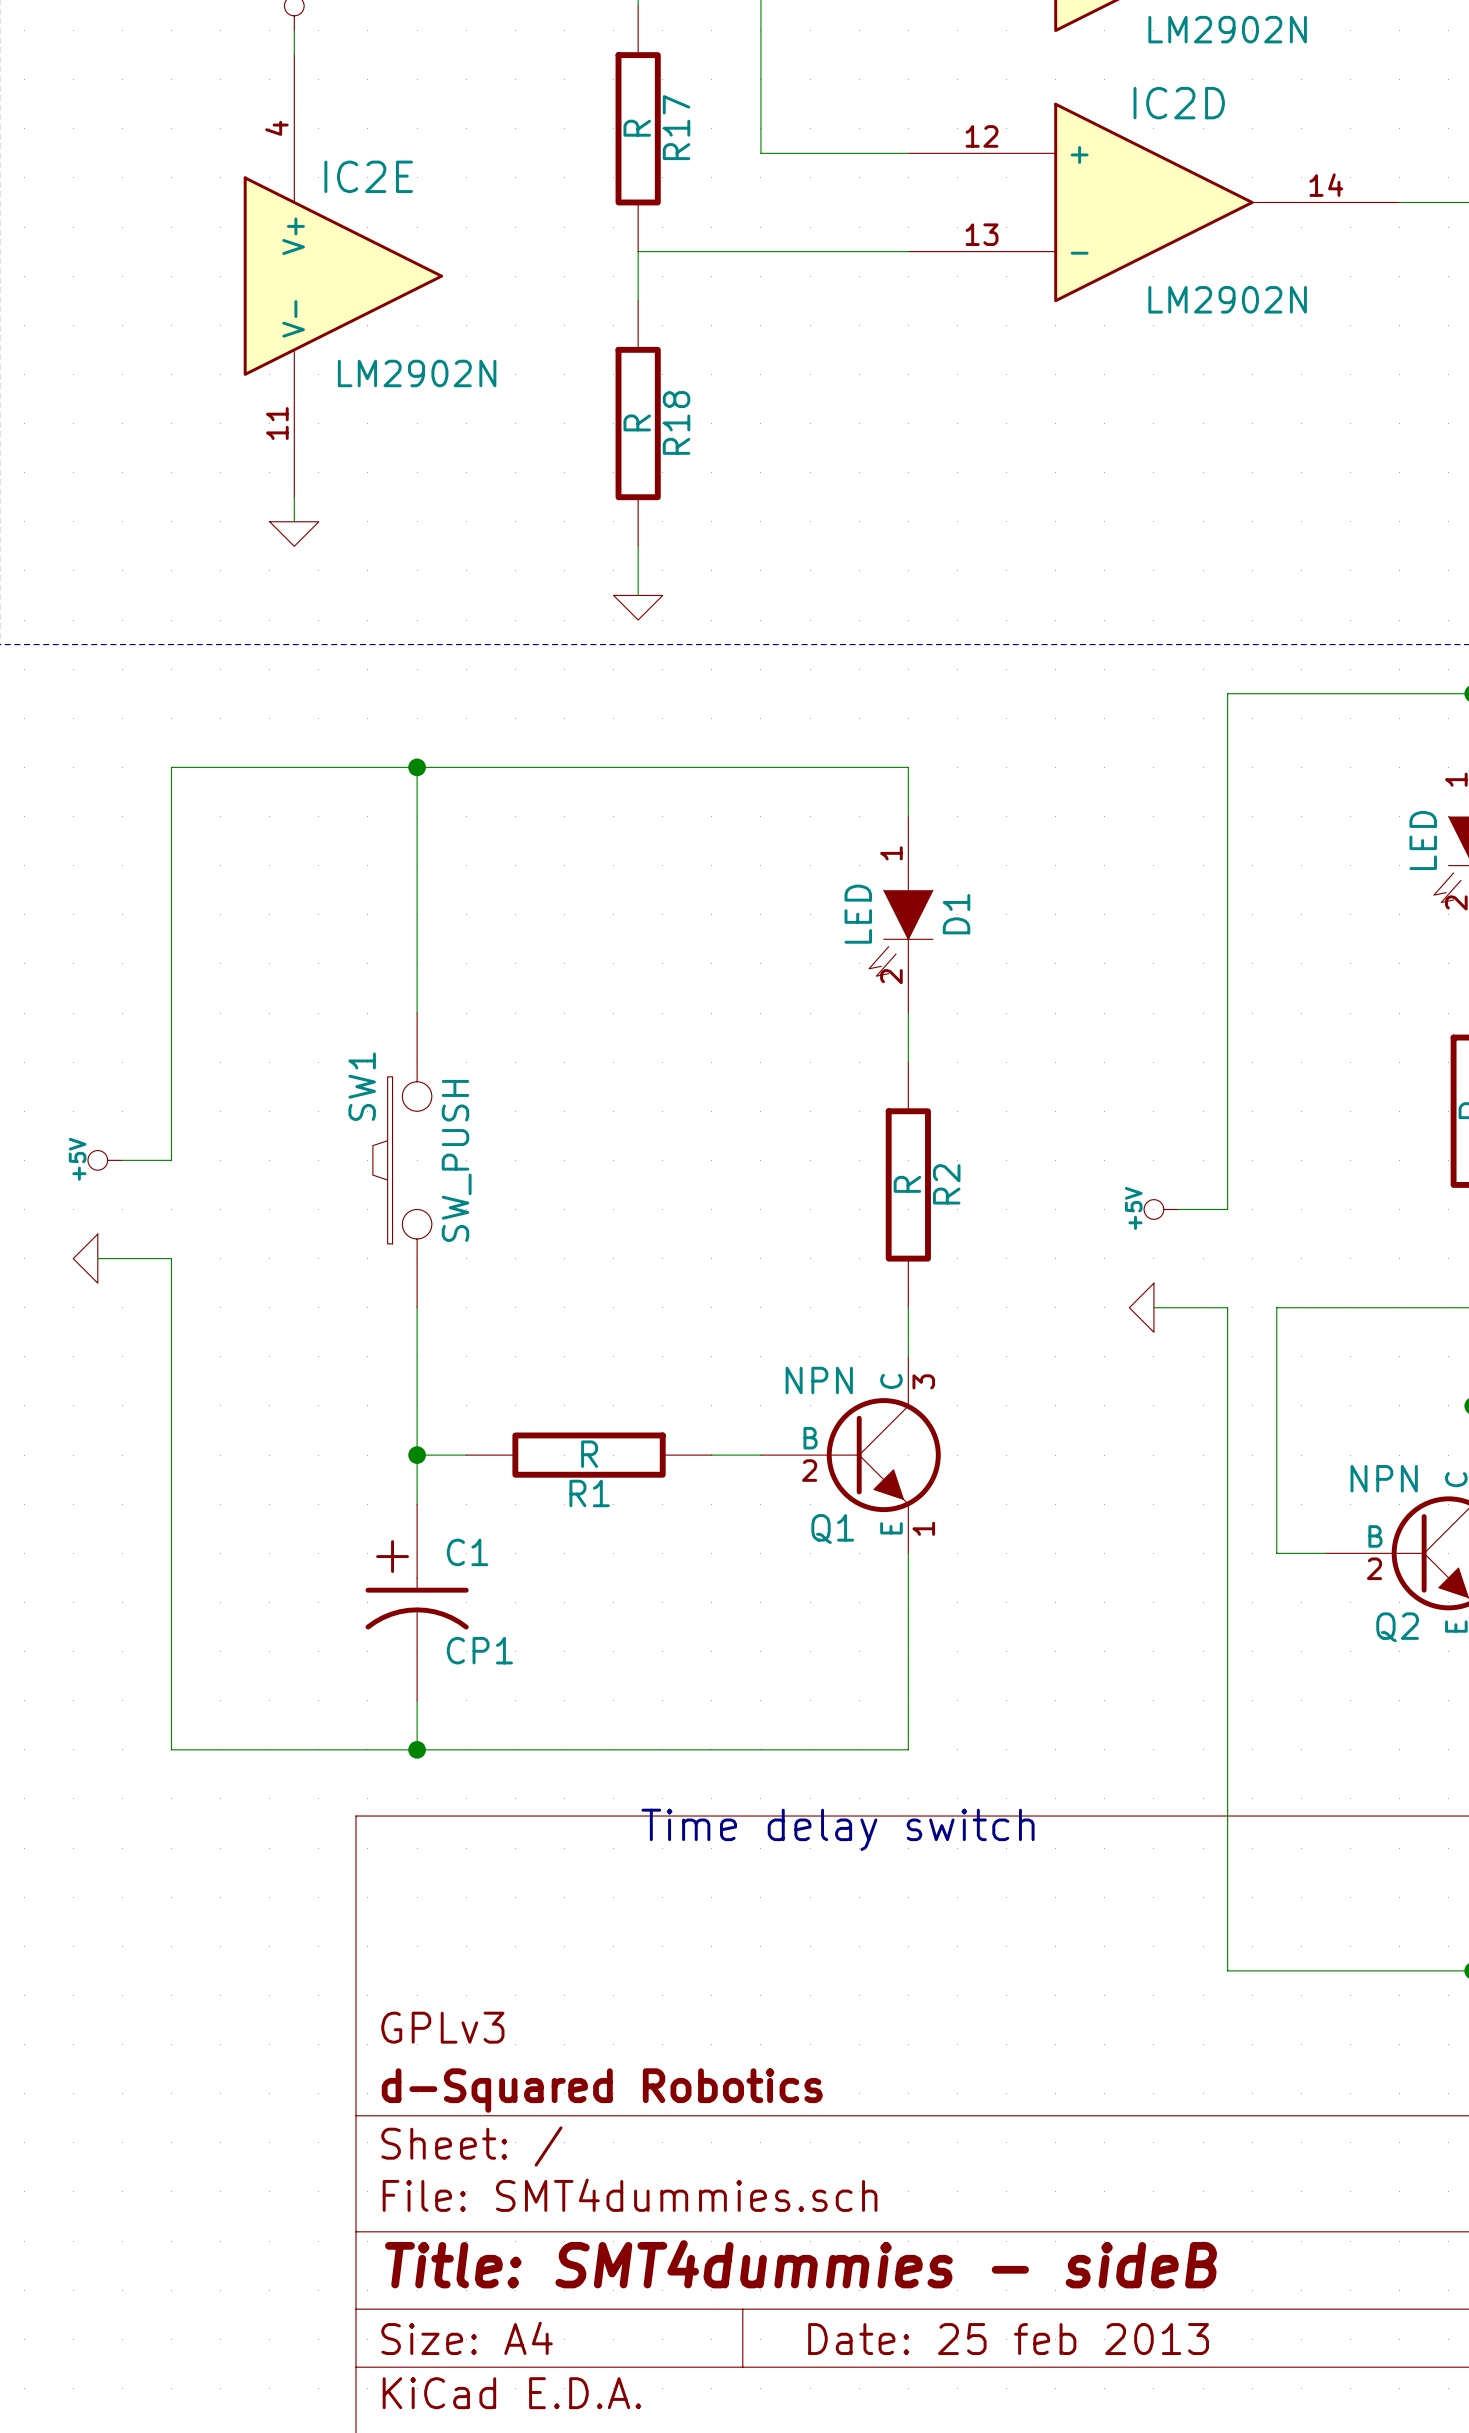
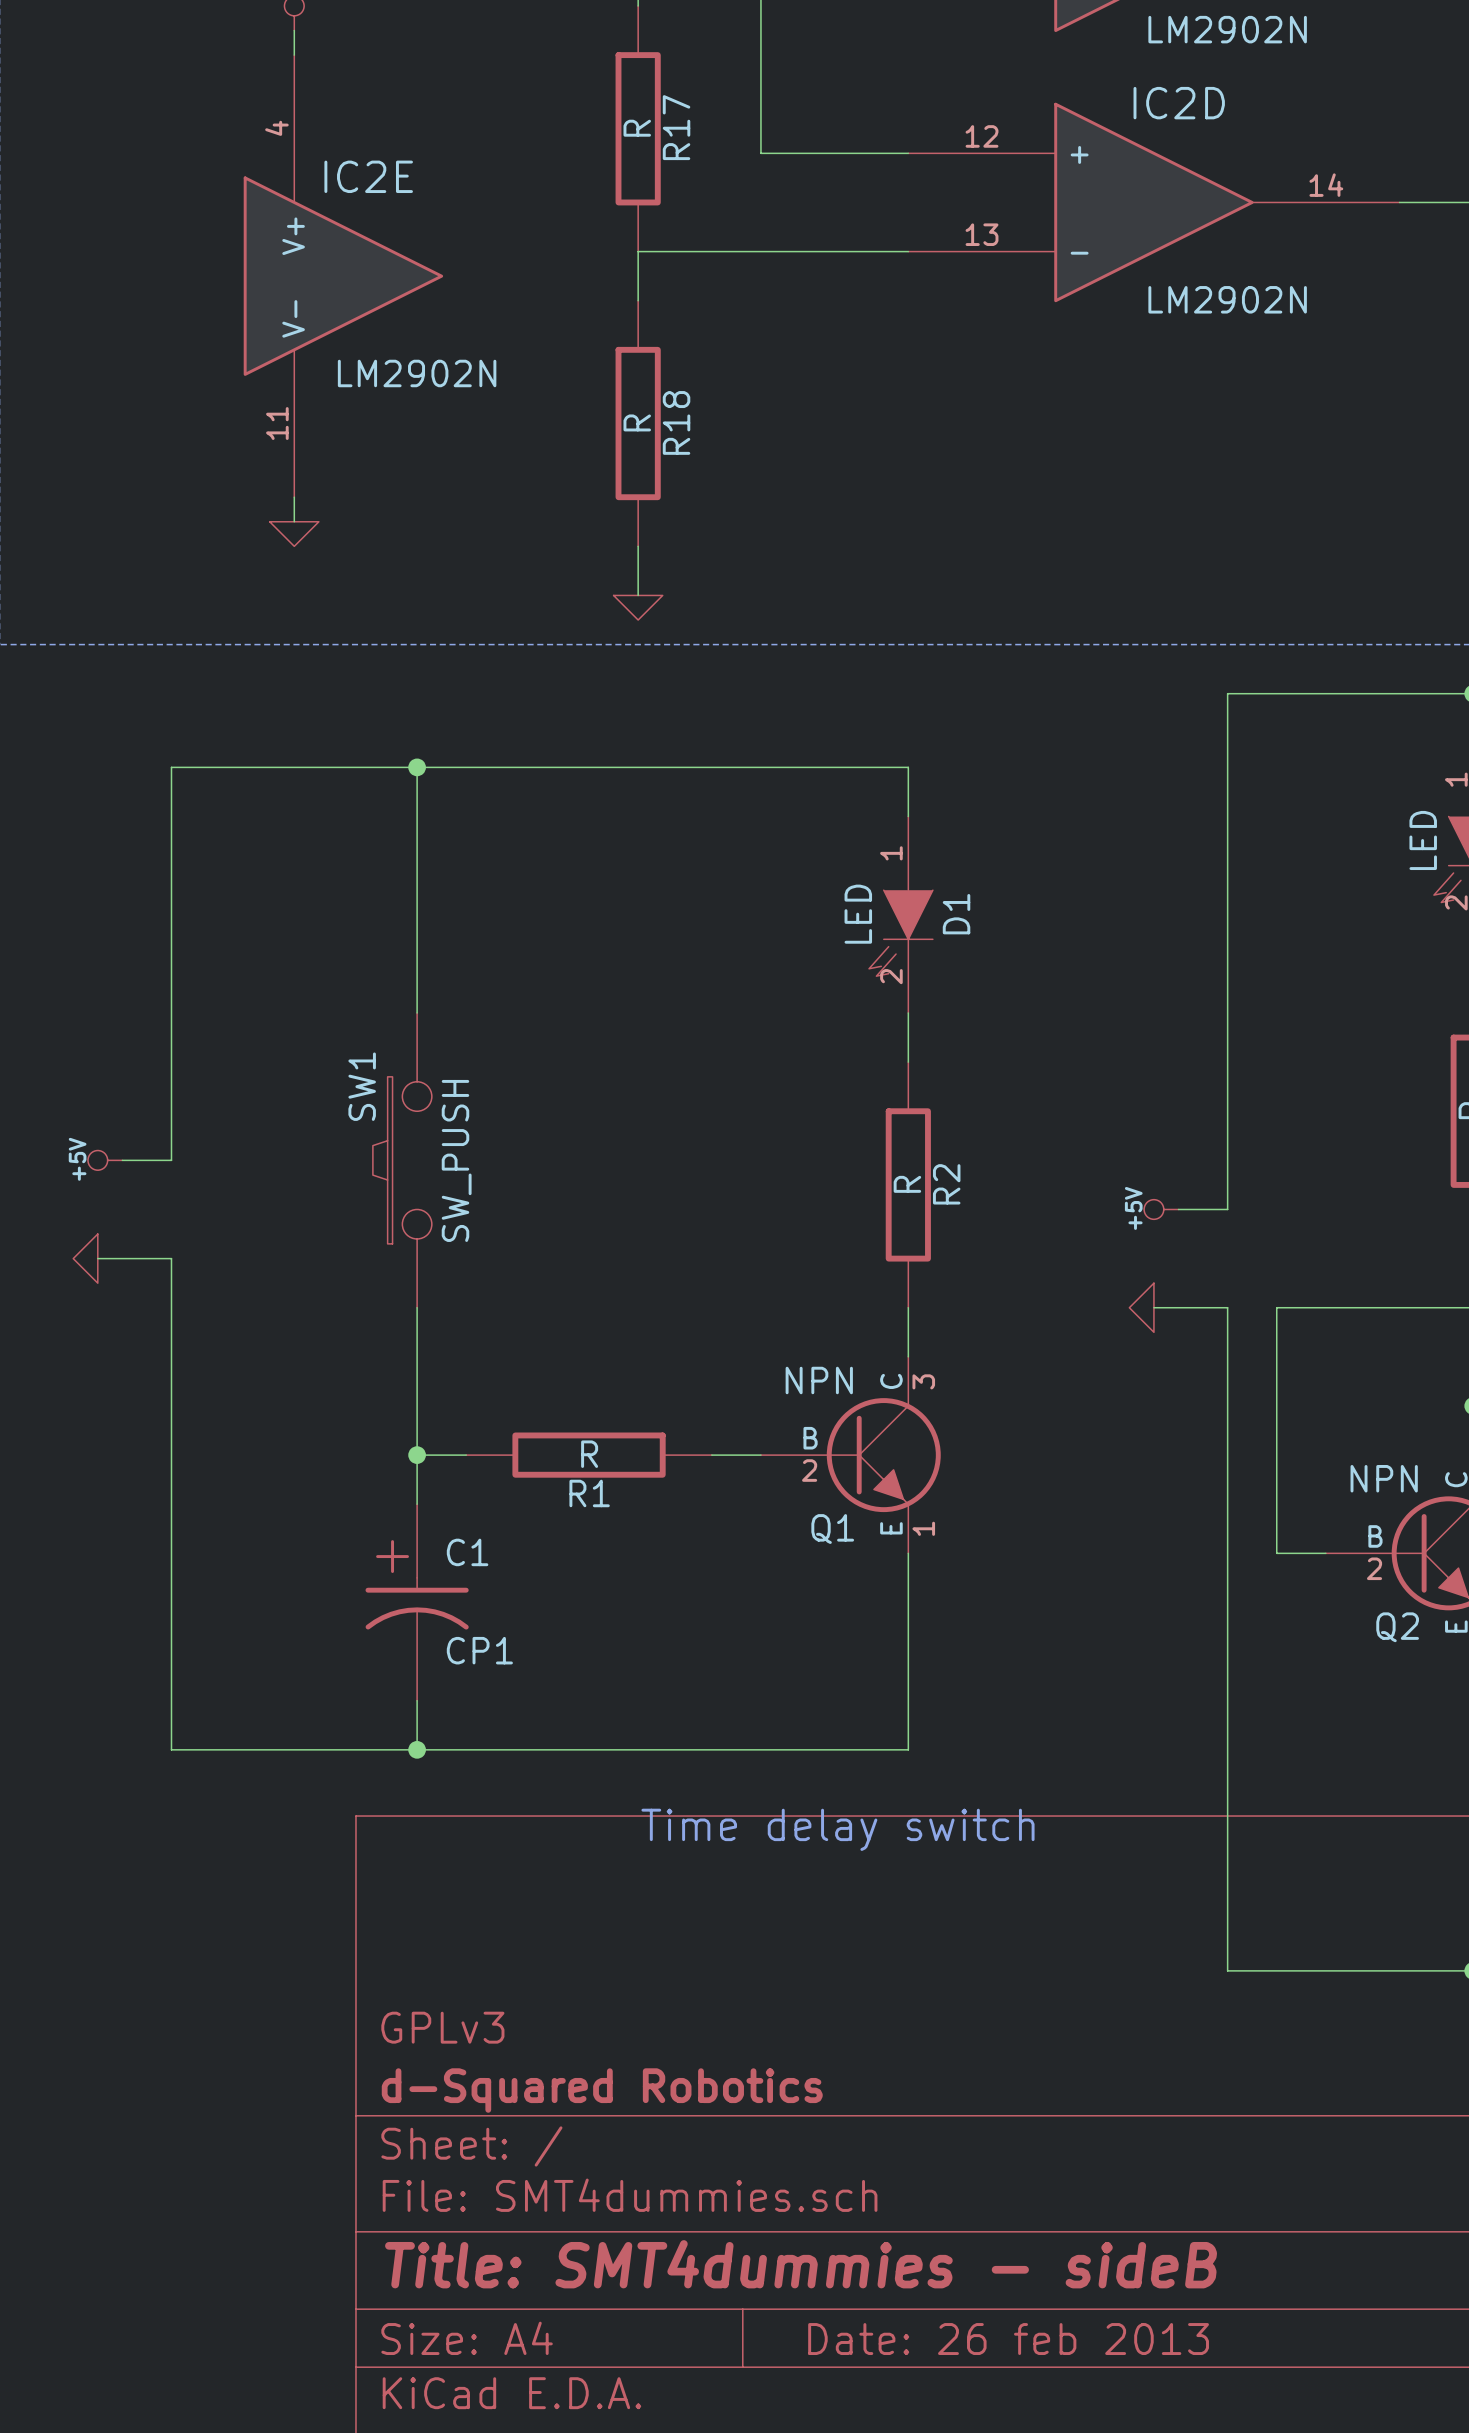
title block: Date: 25 feb 2013 (1008, 2339) -> Date: 26 feb 2013 (1008, 2339)

